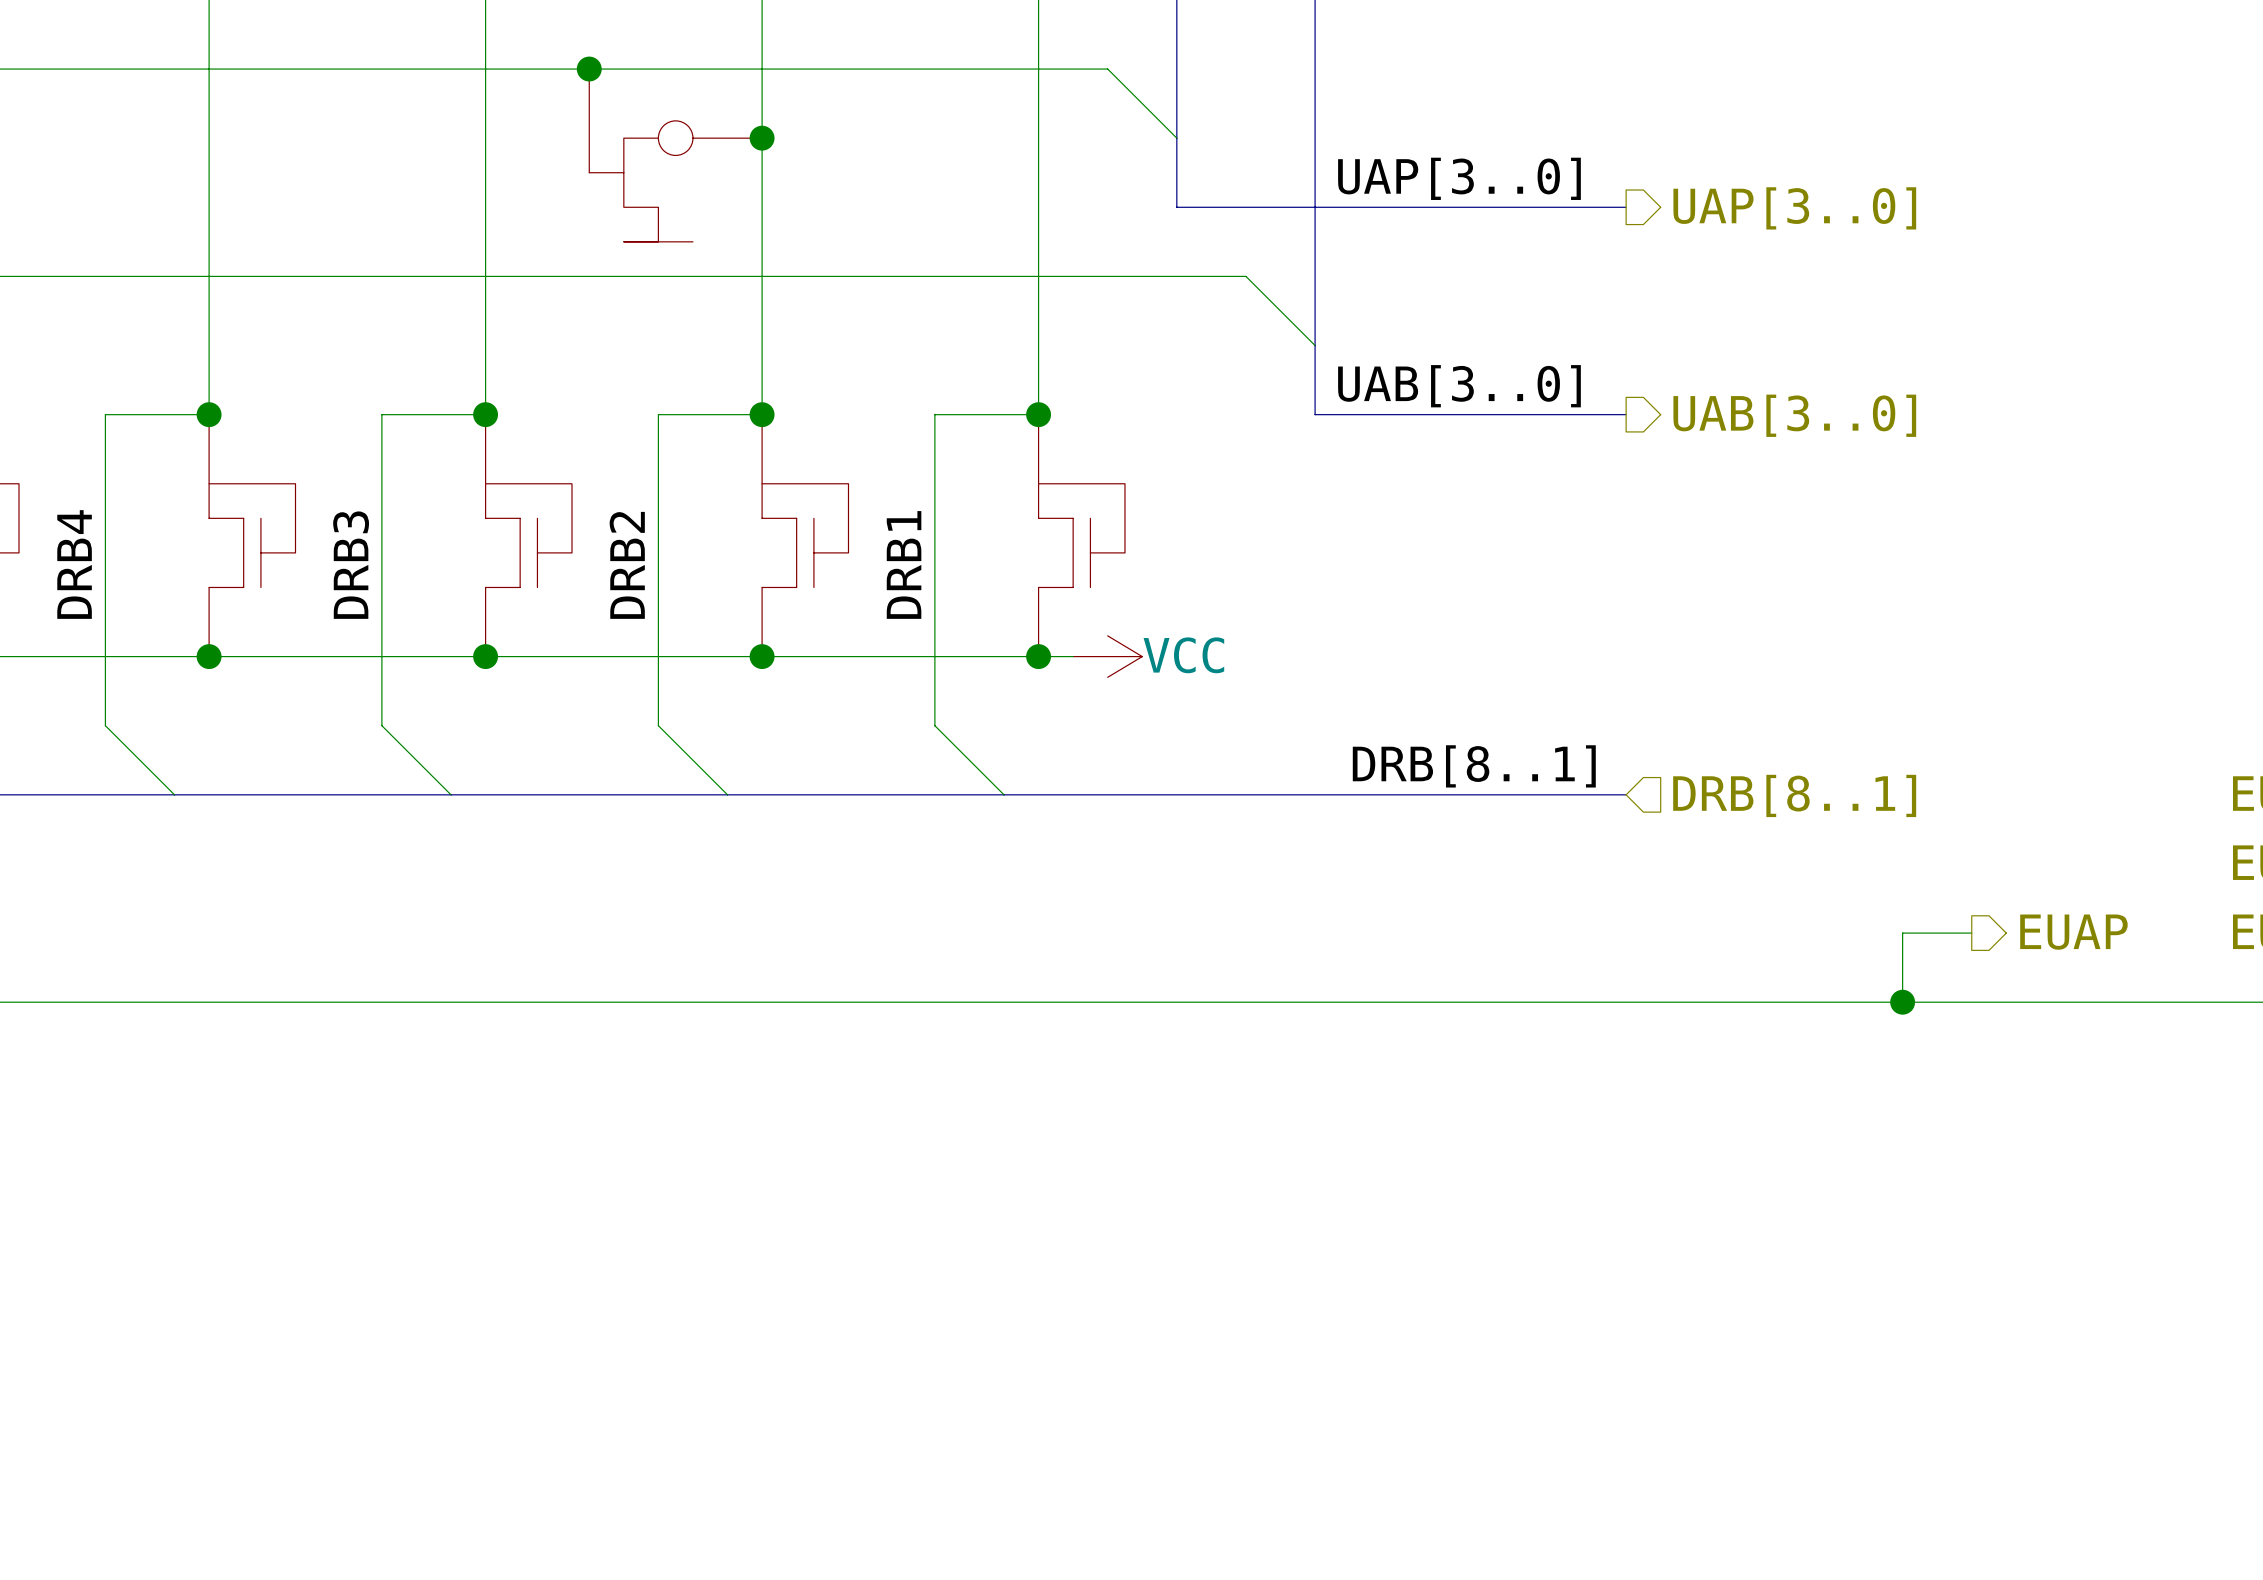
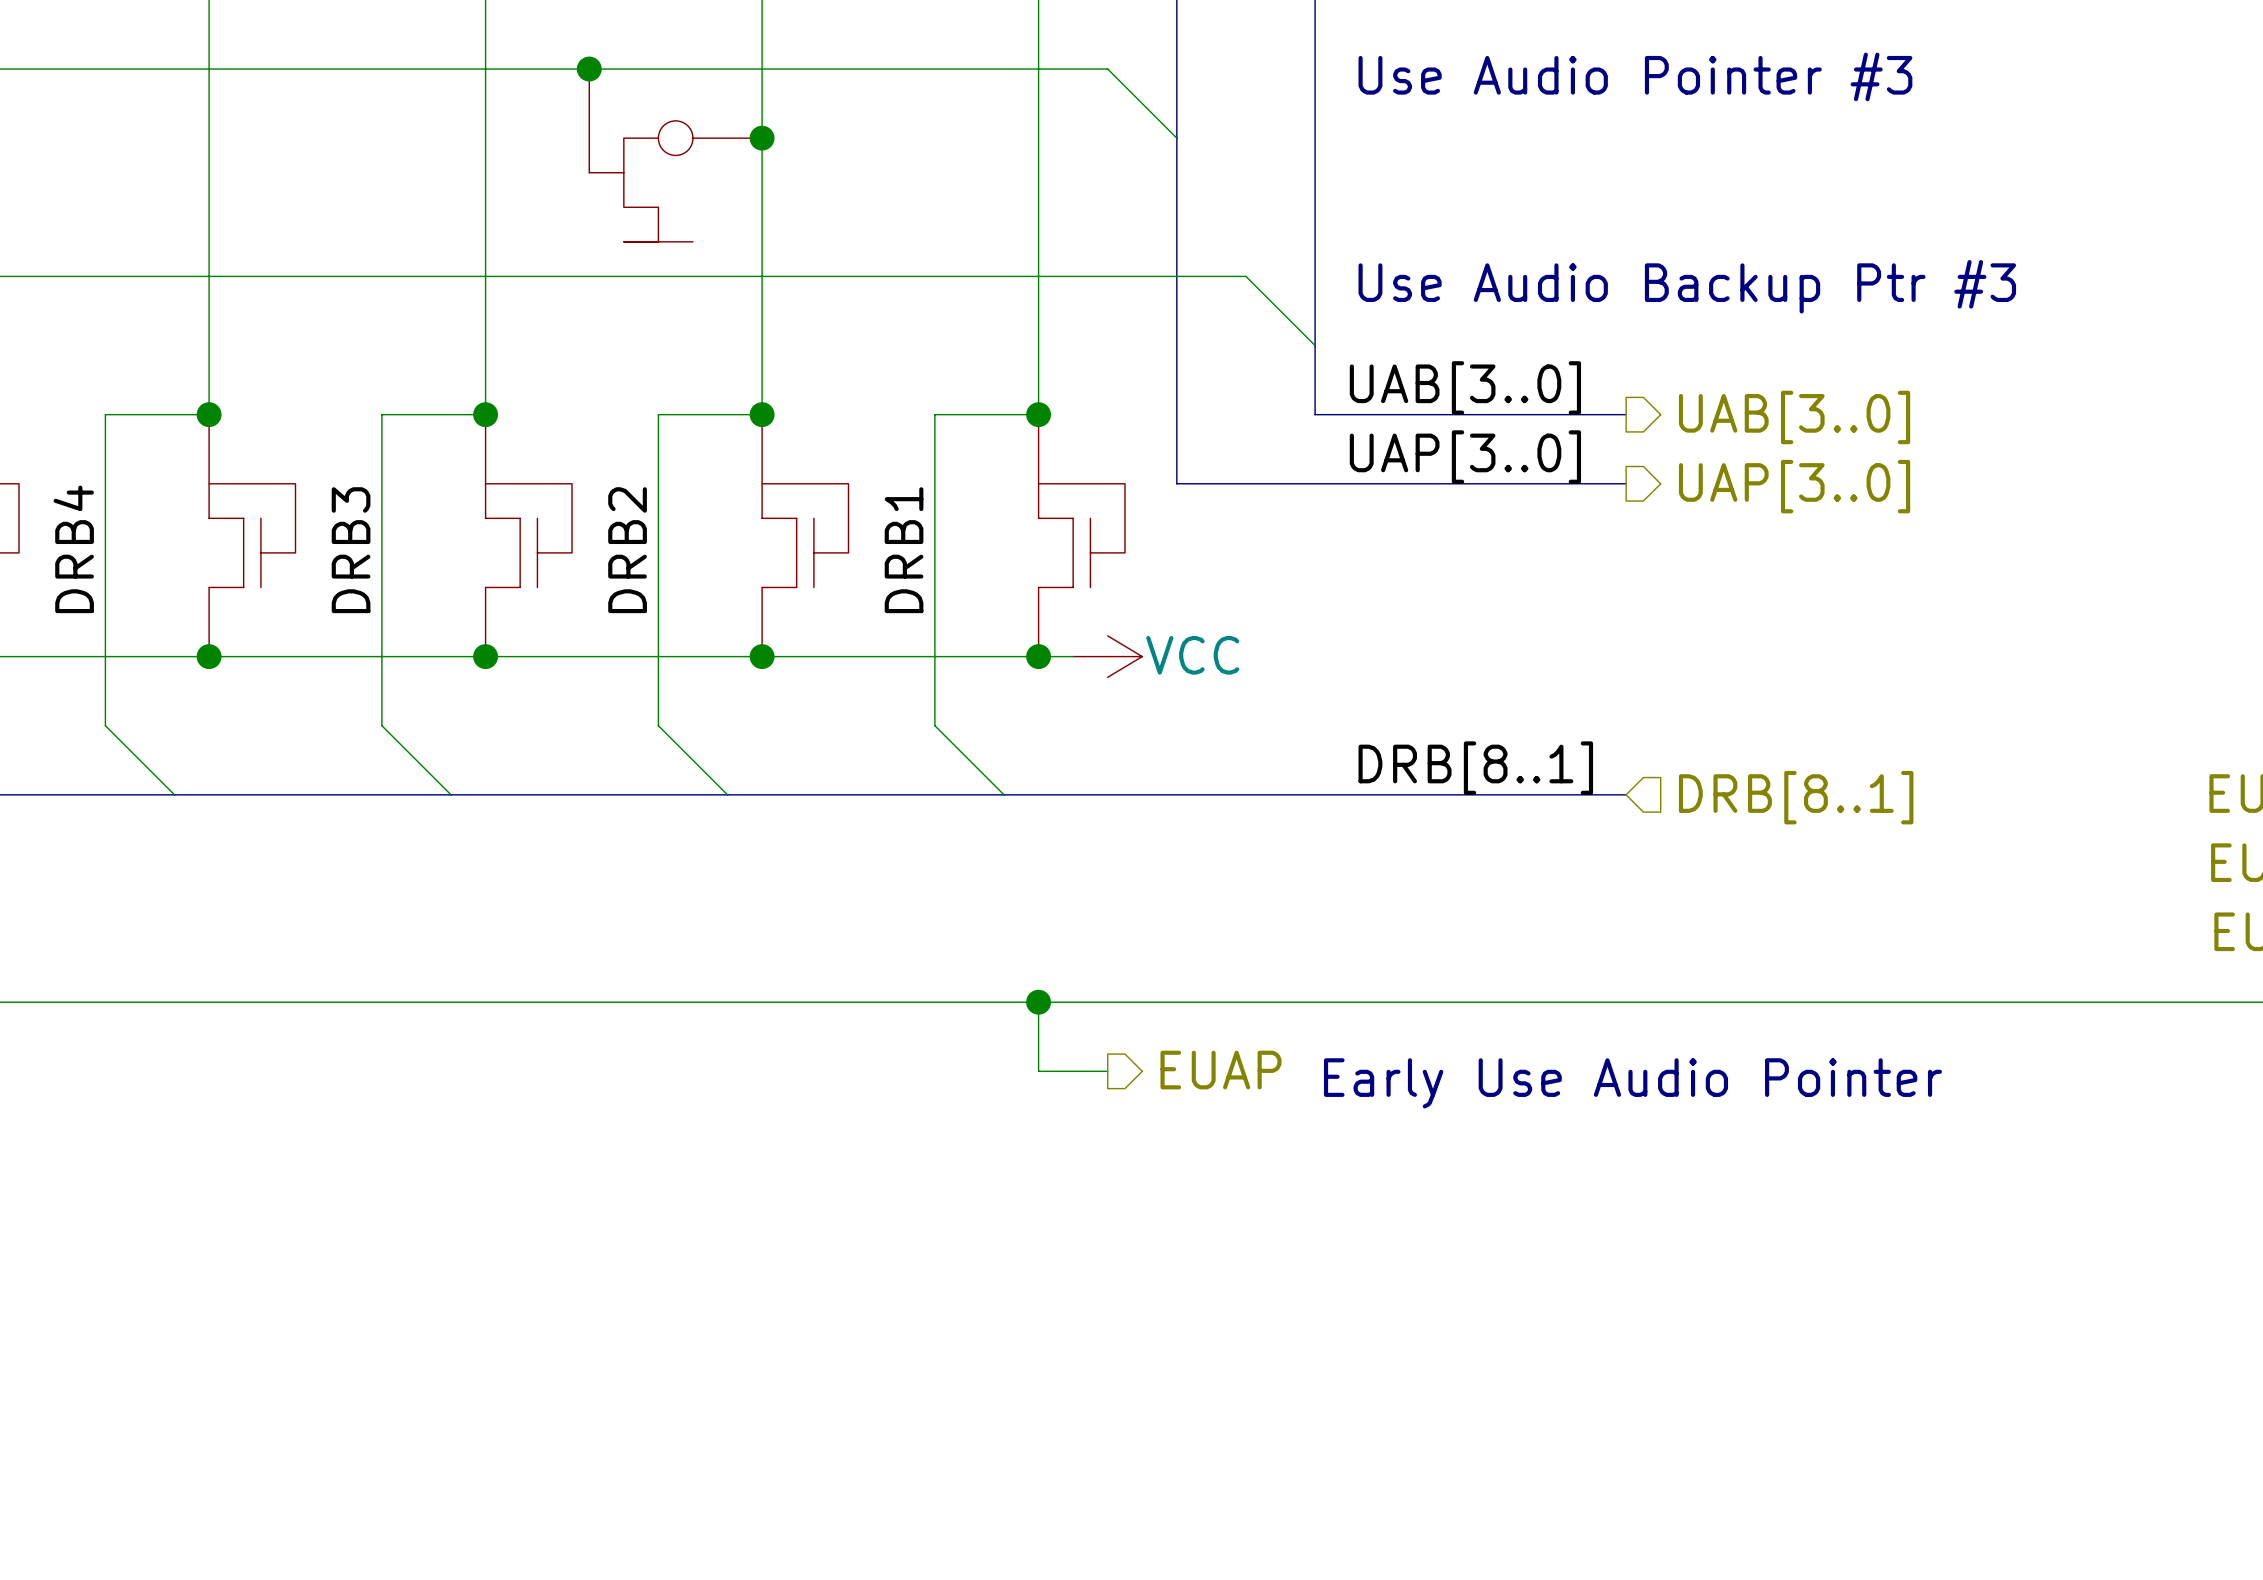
text: none -> Use Audio Pointer #3 (1635, 76)
label position: UAP[3..0] (1459, 178) -> UAP[3..0] (1465, 457)
bus: (1176, 207) (1626, 207) -> (1176, 207) (1176, 483) (1626, 483)
hierarchical label position: UAP[3..0] (1794, 208) -> UAP[3..0] (1794, 486)
text: none -> Use Audio Backup Ptr #3 (1687, 286)
hierarchical label: EUAP (2073, 932) -> none
wire: (1971, 933) (1902, 933) (1902, 1002) -> none
wire: none -> (1038, 1002) (1038, 1071) (1107, 1071)
junction: none -> (1038, 1002)
junction: (1902, 1002) -> none
hierarchical label: none -> EUAP (1220, 1070)
text: none -> Early Use Audio Pointer (1632, 1083)

